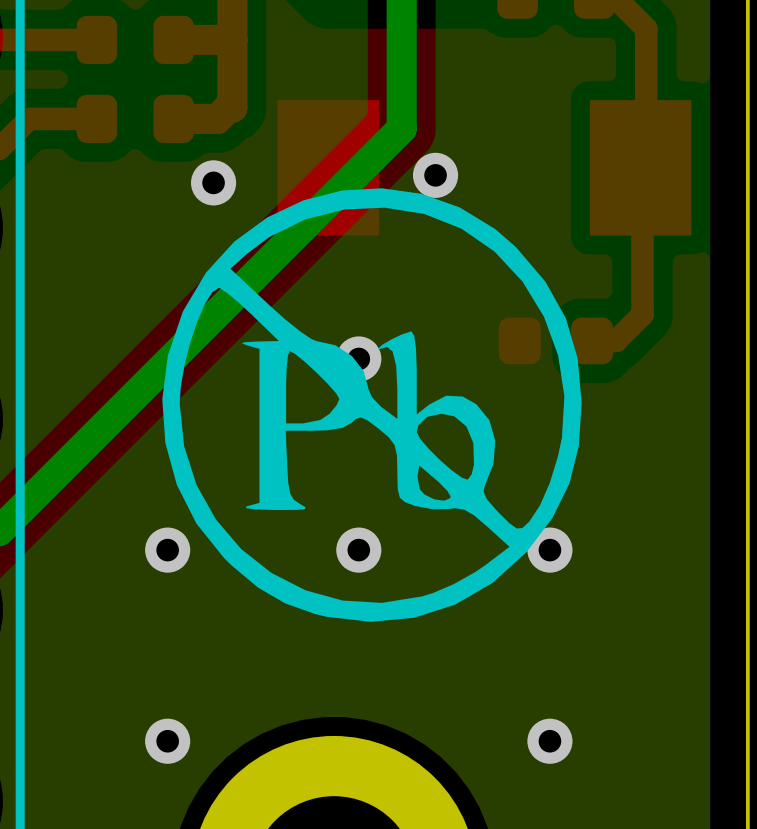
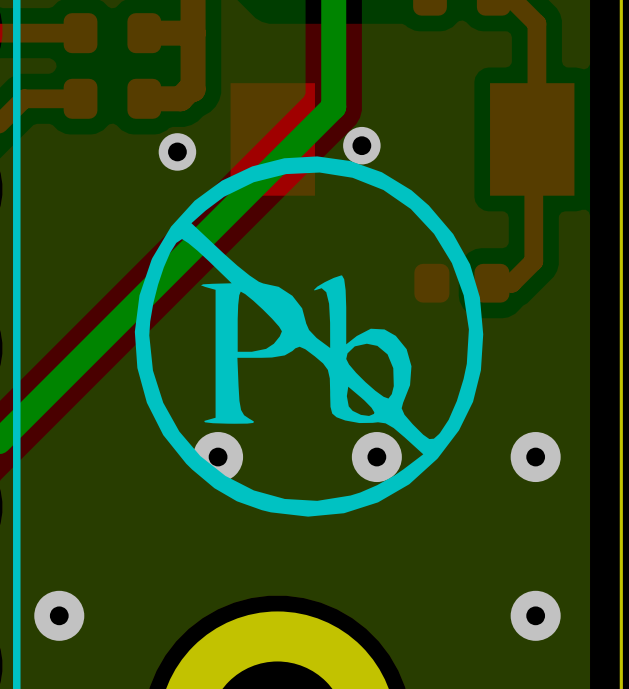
via: (358, 358) -> none
via: (167, 550) -> none
via: none -> (218, 457)
via: (358, 550) -> none
via: none -> (376, 457)
via: (549, 550) -> none
via: none -> (535, 457)
via: none -> (59, 615)
via: (167, 741) -> none
via: (549, 741) -> none
via: none -> (535, 615)

